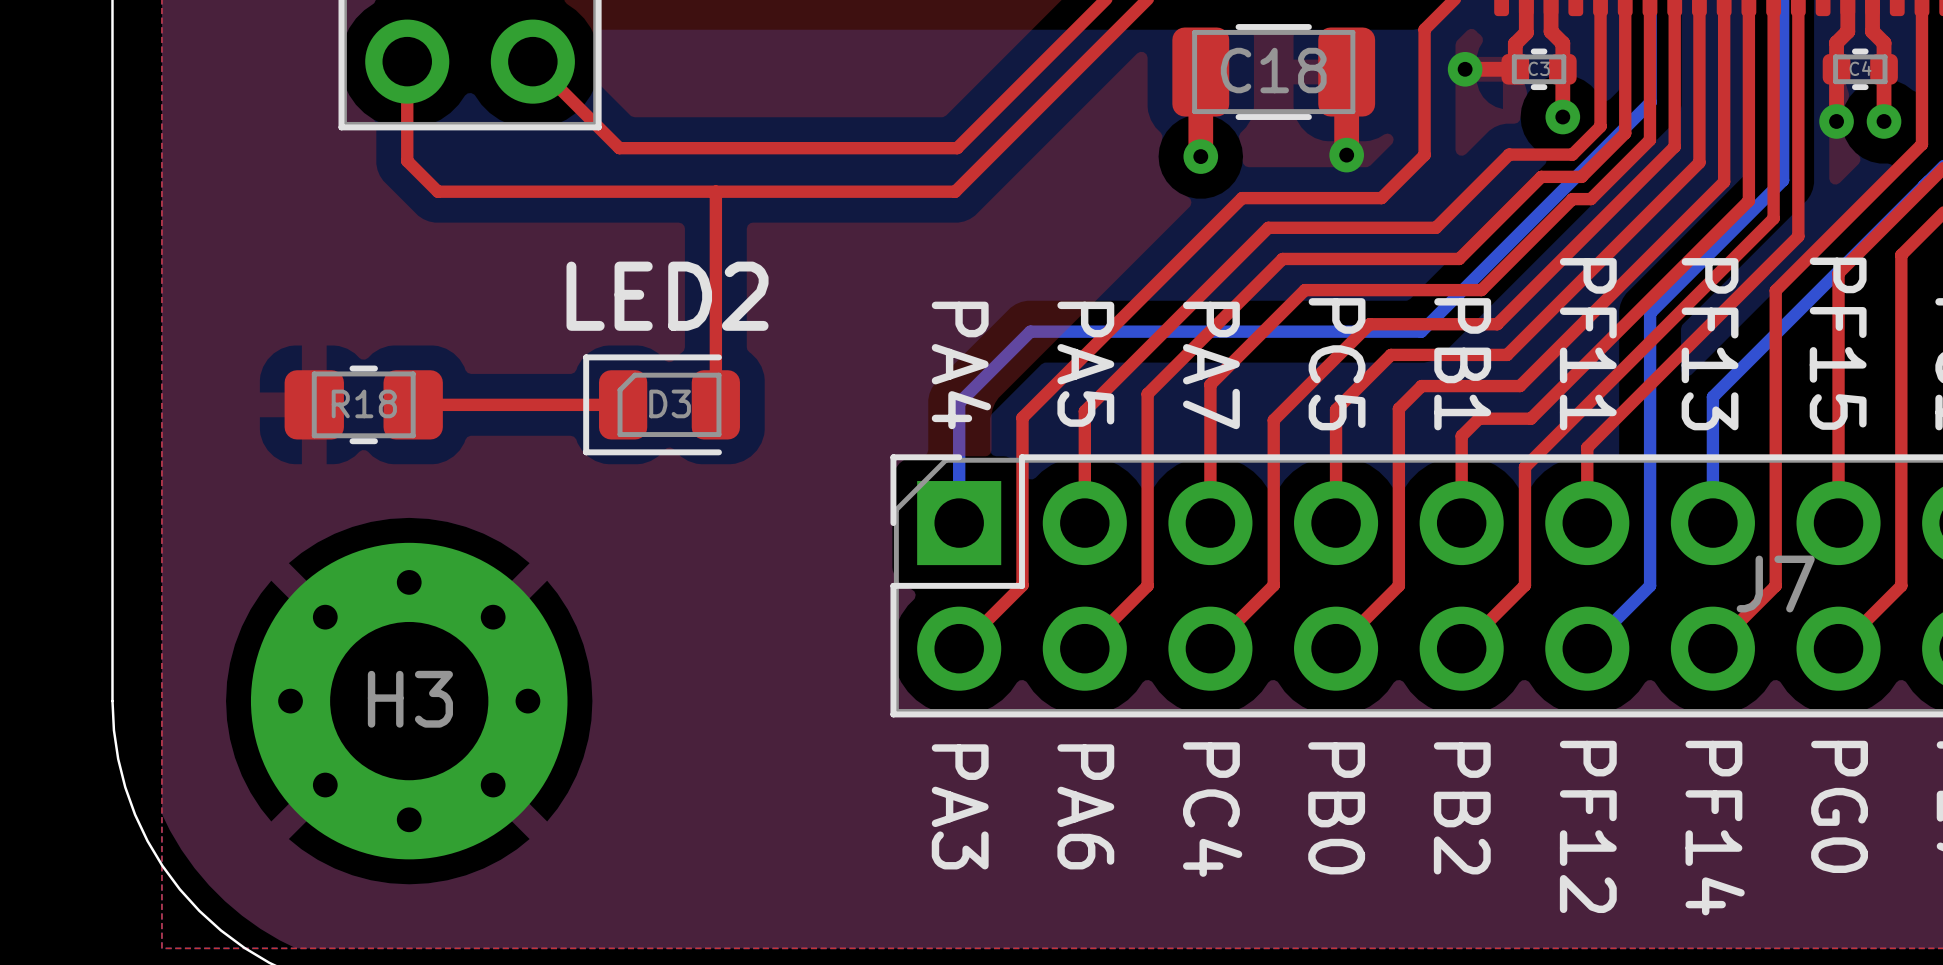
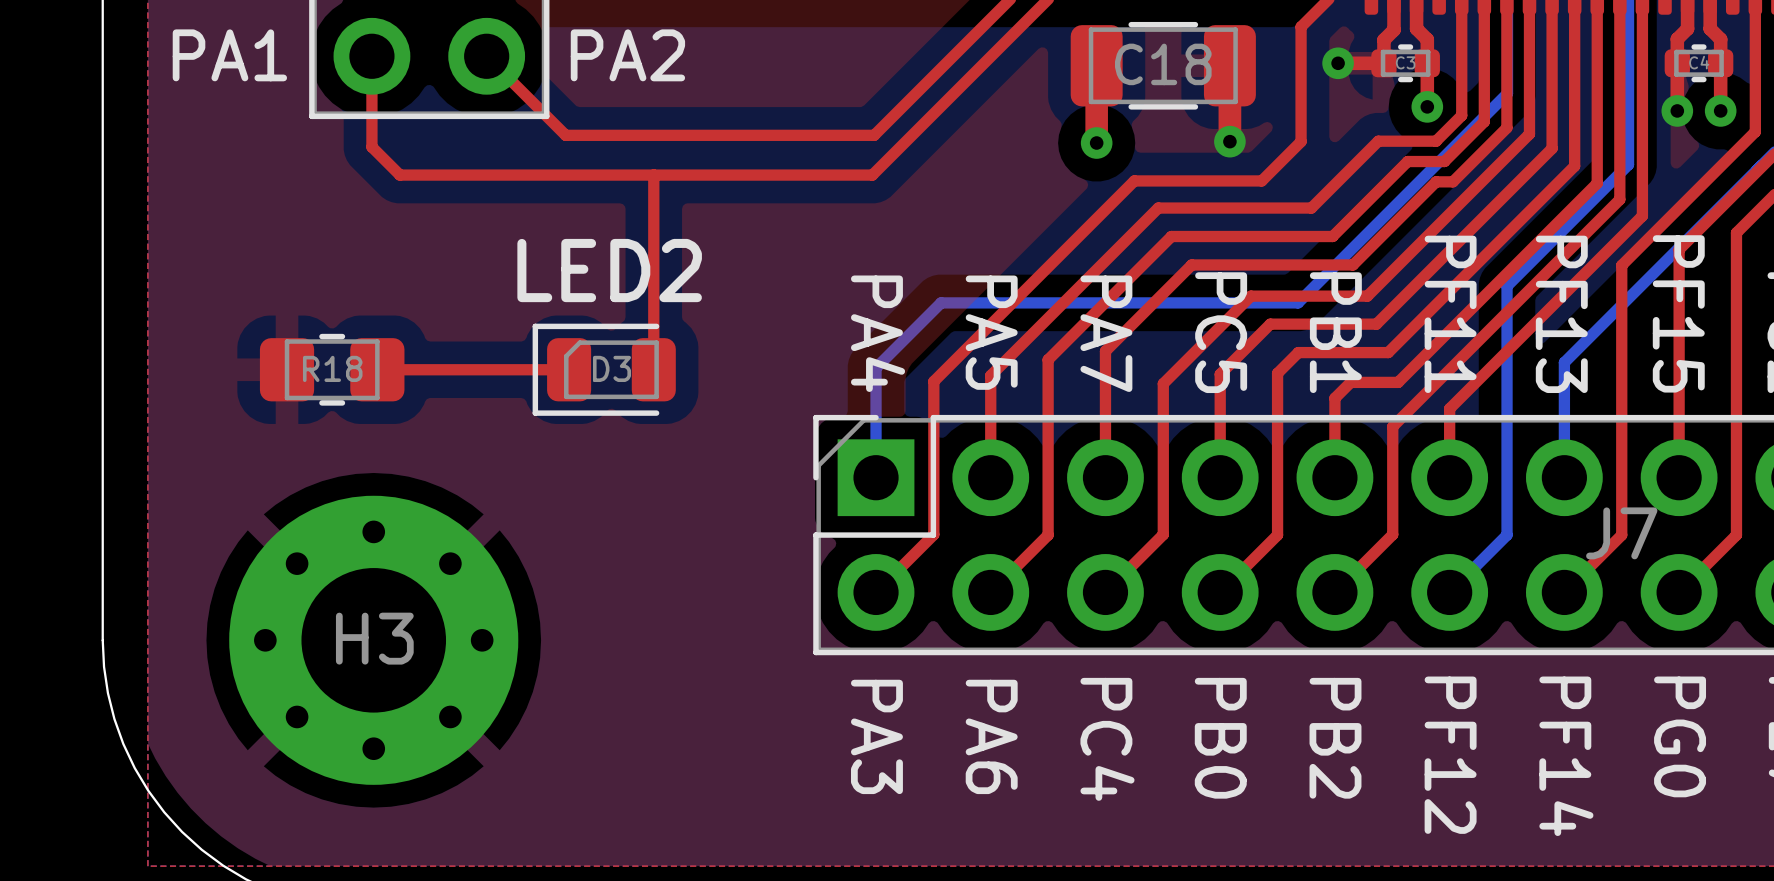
text: none -> PA1 (229, 55)
text: none -> PA2 (627, 55)

